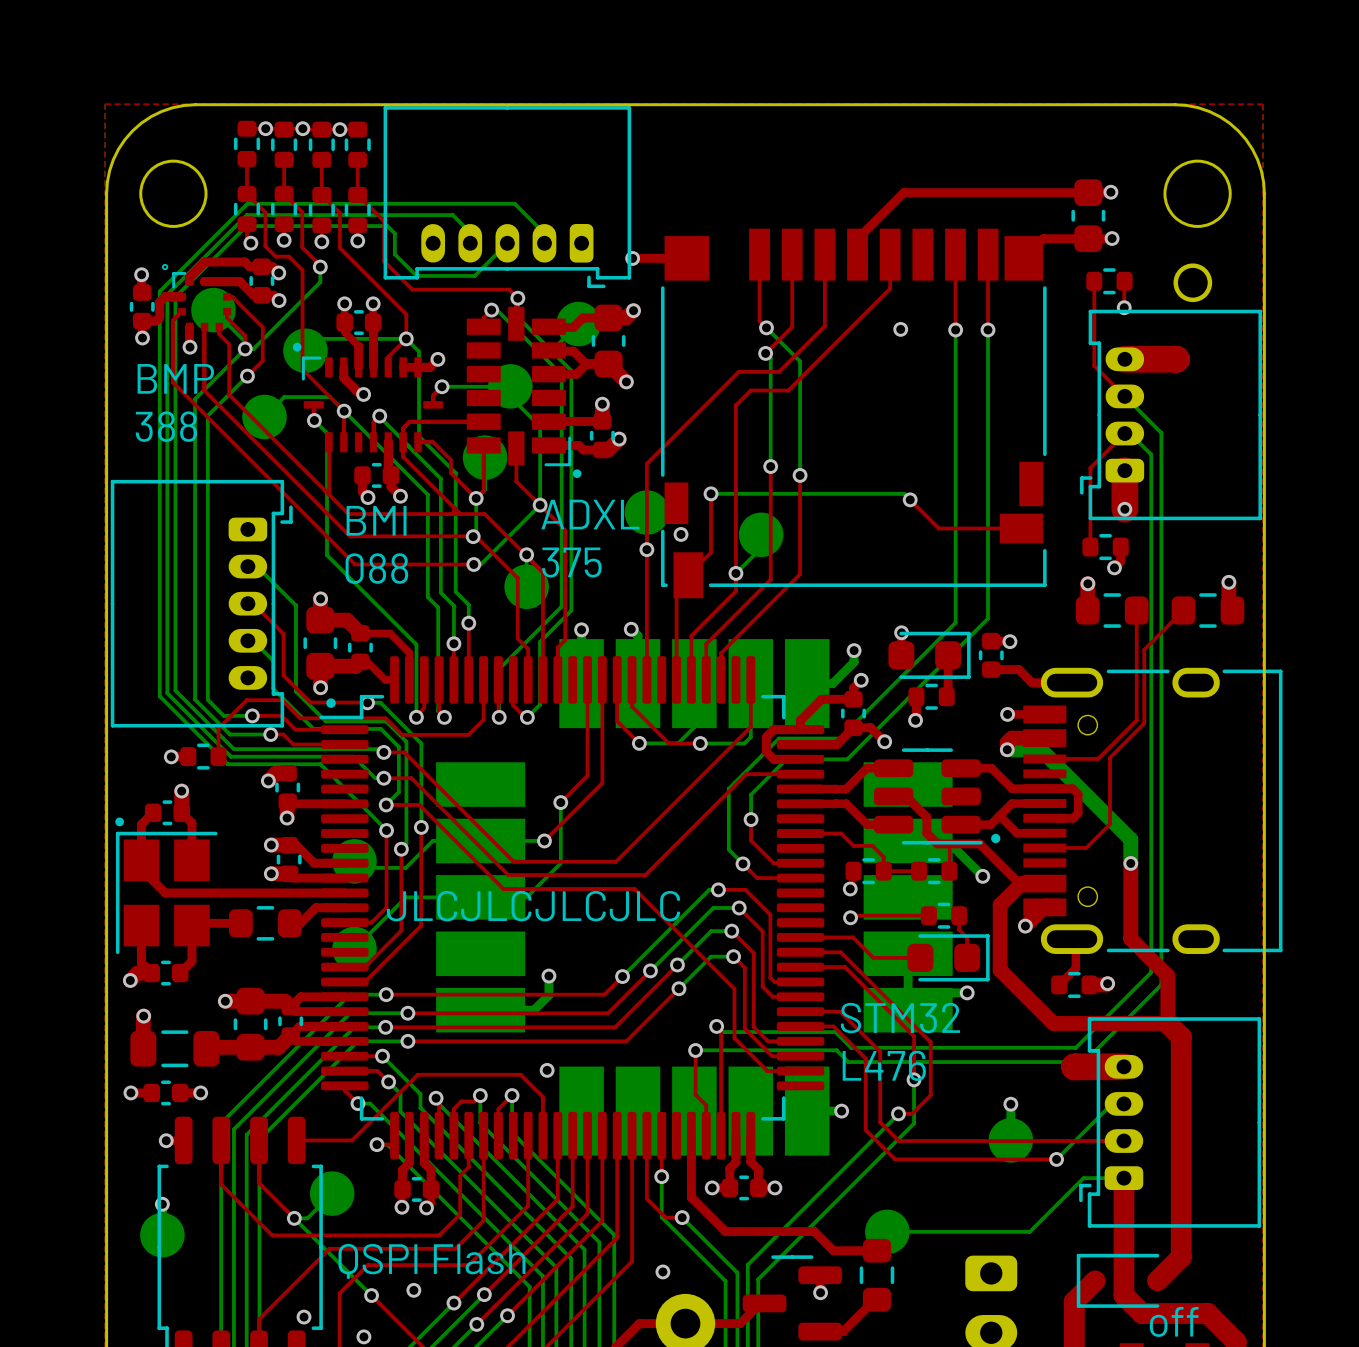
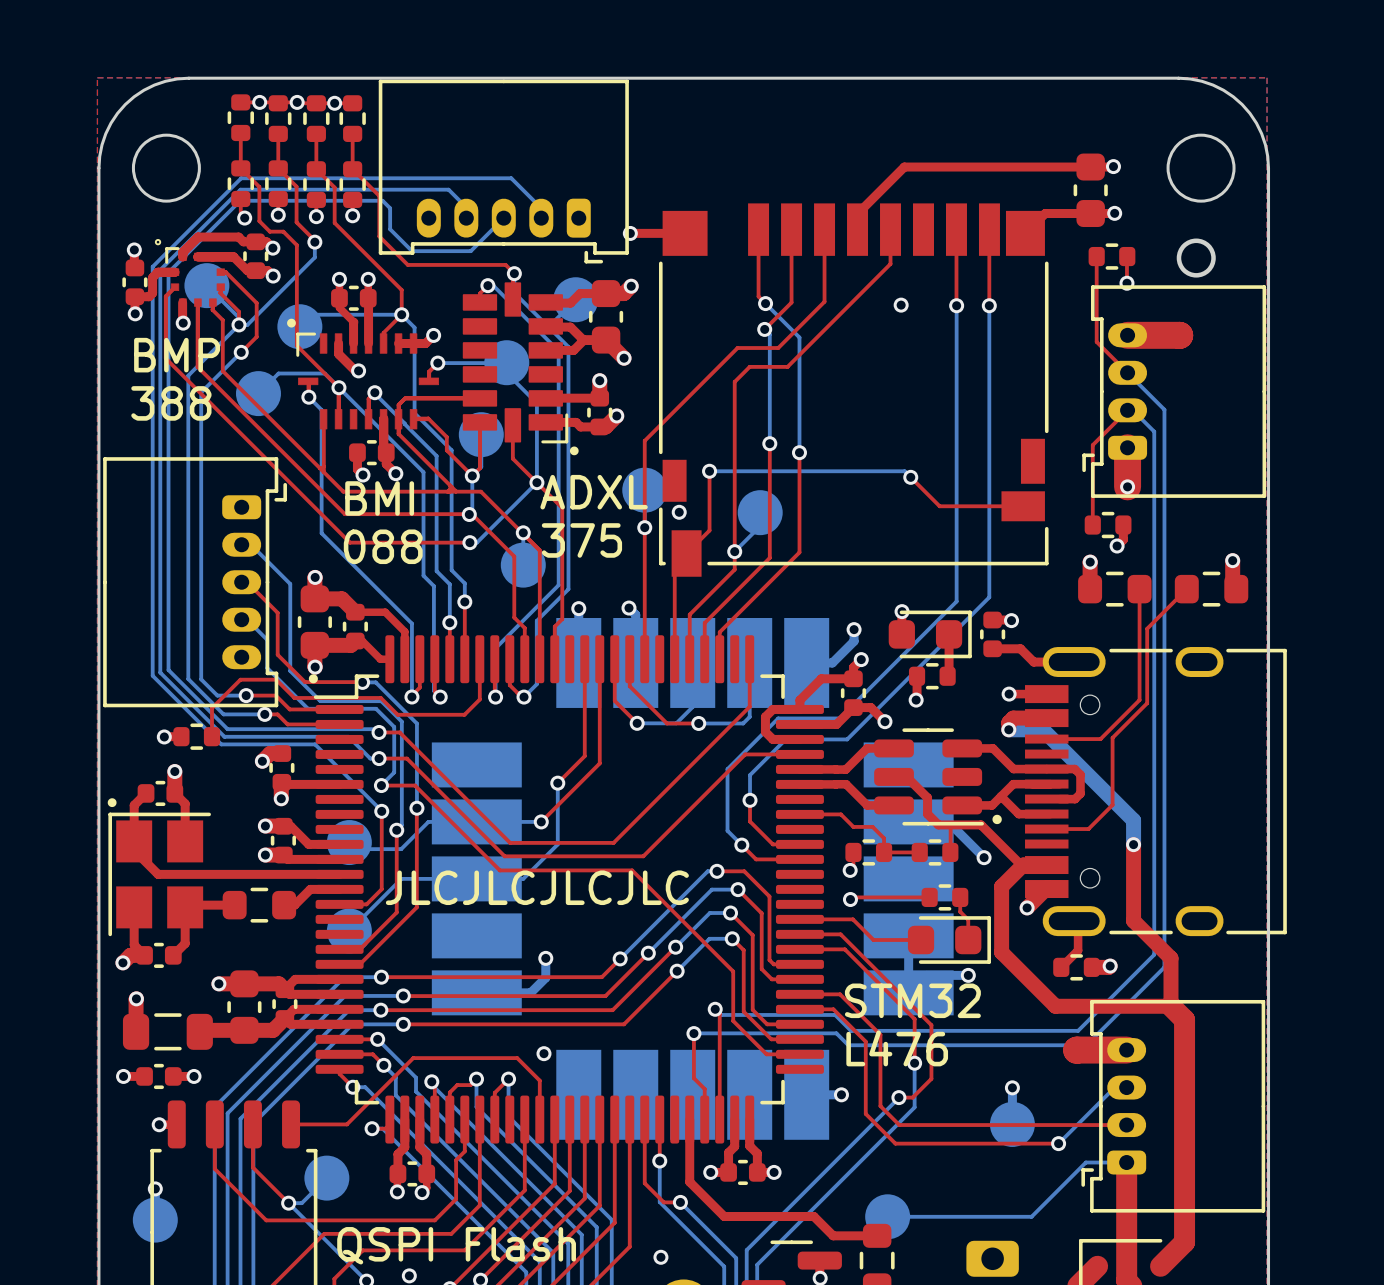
drawing: none -> [308, 674, 318, 684]
drawing: [326, 698, 336, 708] -> none

